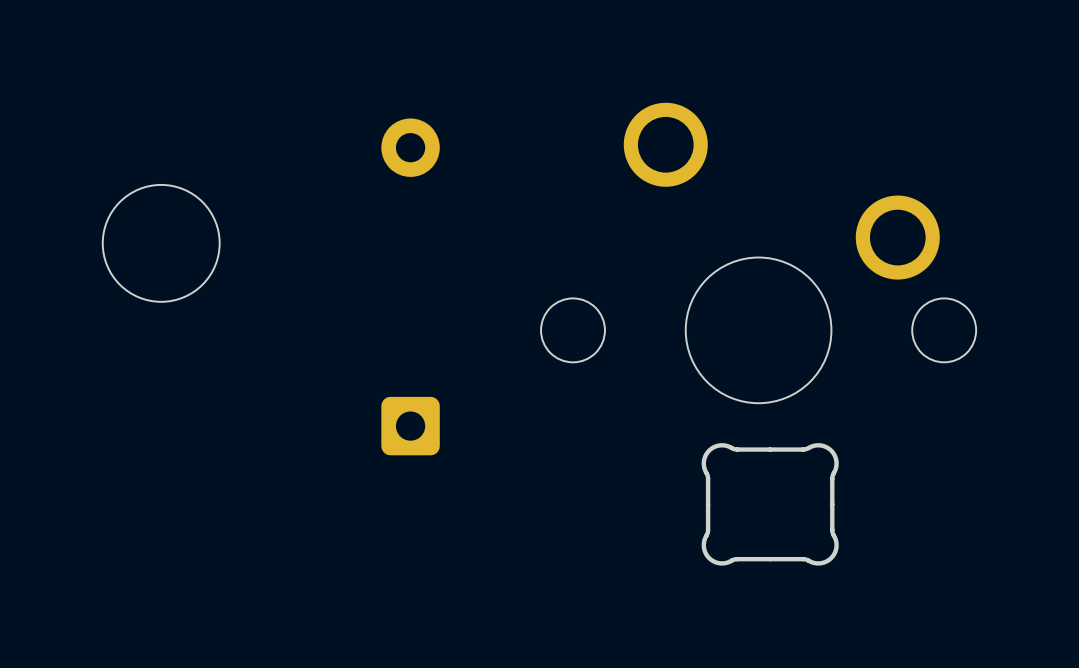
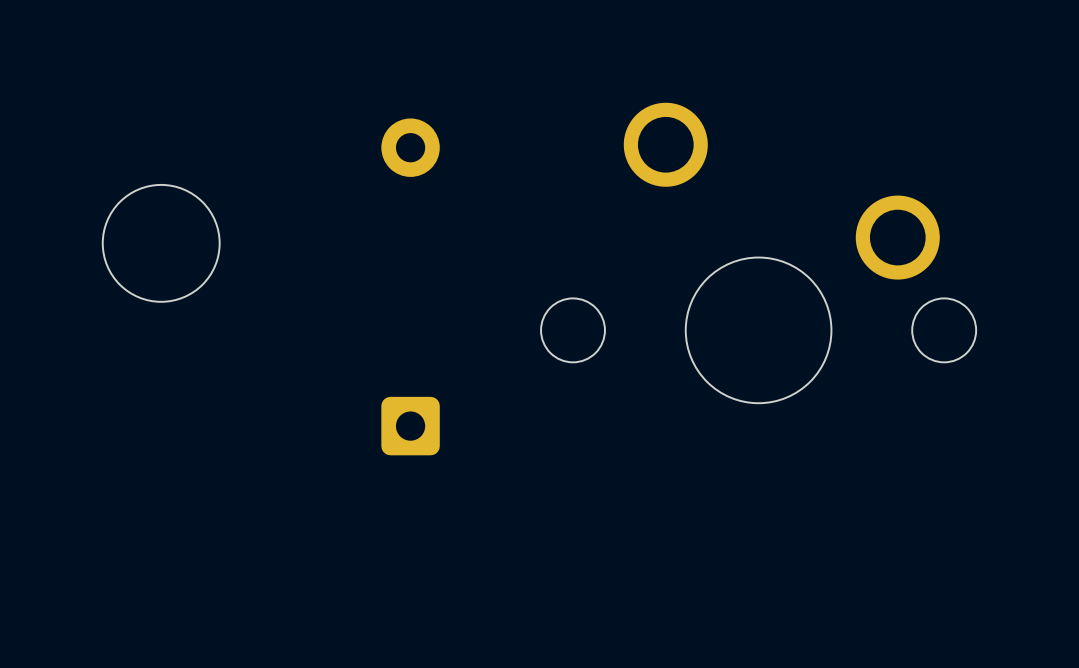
part: (770, 504) -> none

